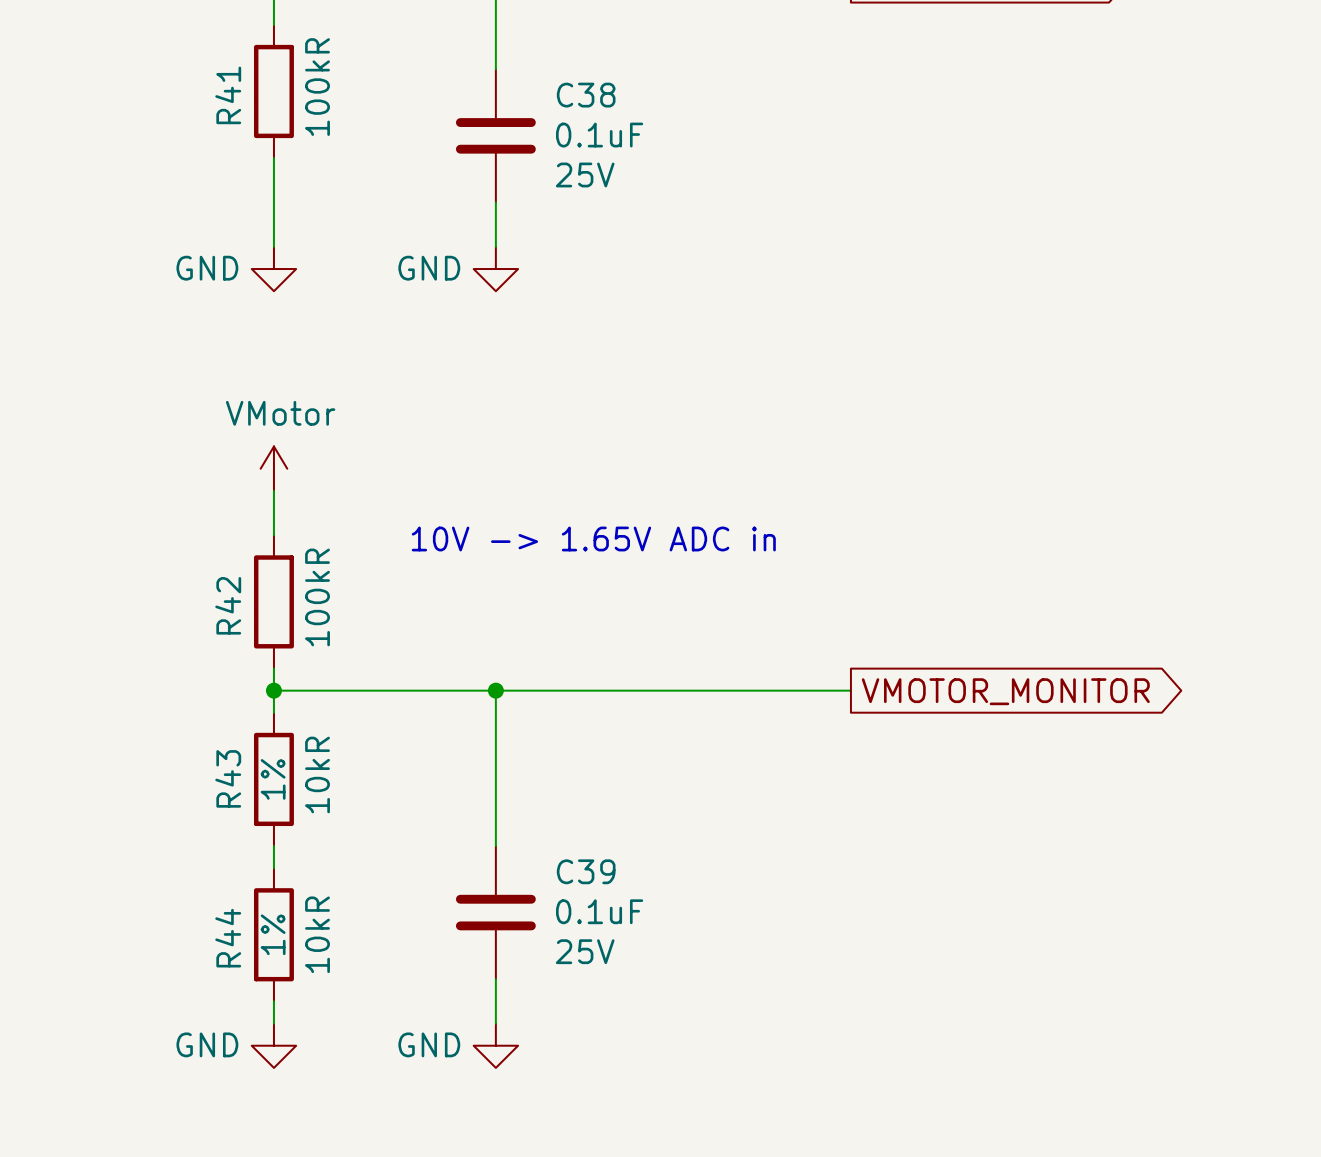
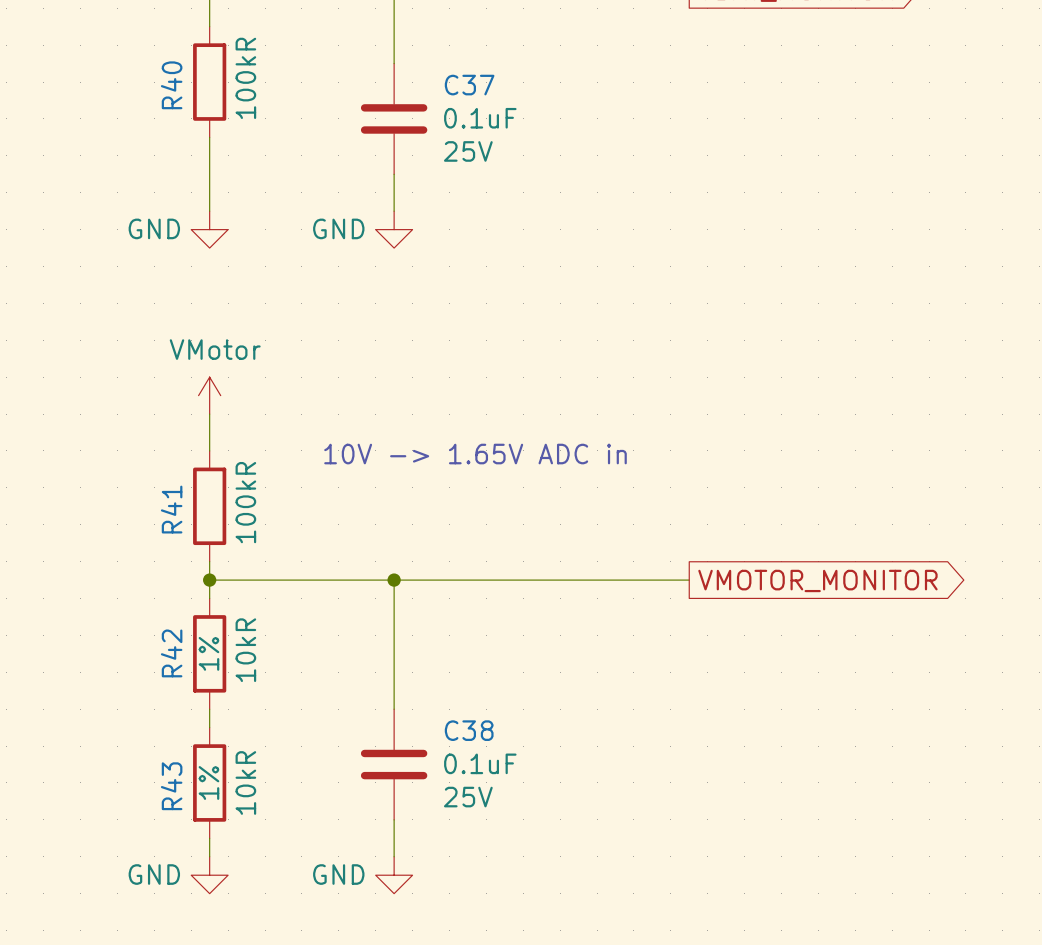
R41 name: R41 (228, 95) -> R40 (171, 85)
C38 name: C38 (586, 95) -> C37 (469, 85)
R42 name: R42 (228, 605) -> R41 (171, 509)
R43 name: R43 (228, 778) -> R42 (171, 653)
C39 name: C39 (586, 871) -> C38 (469, 730)
R44 name: R44 (228, 938) -> R43 (171, 786)

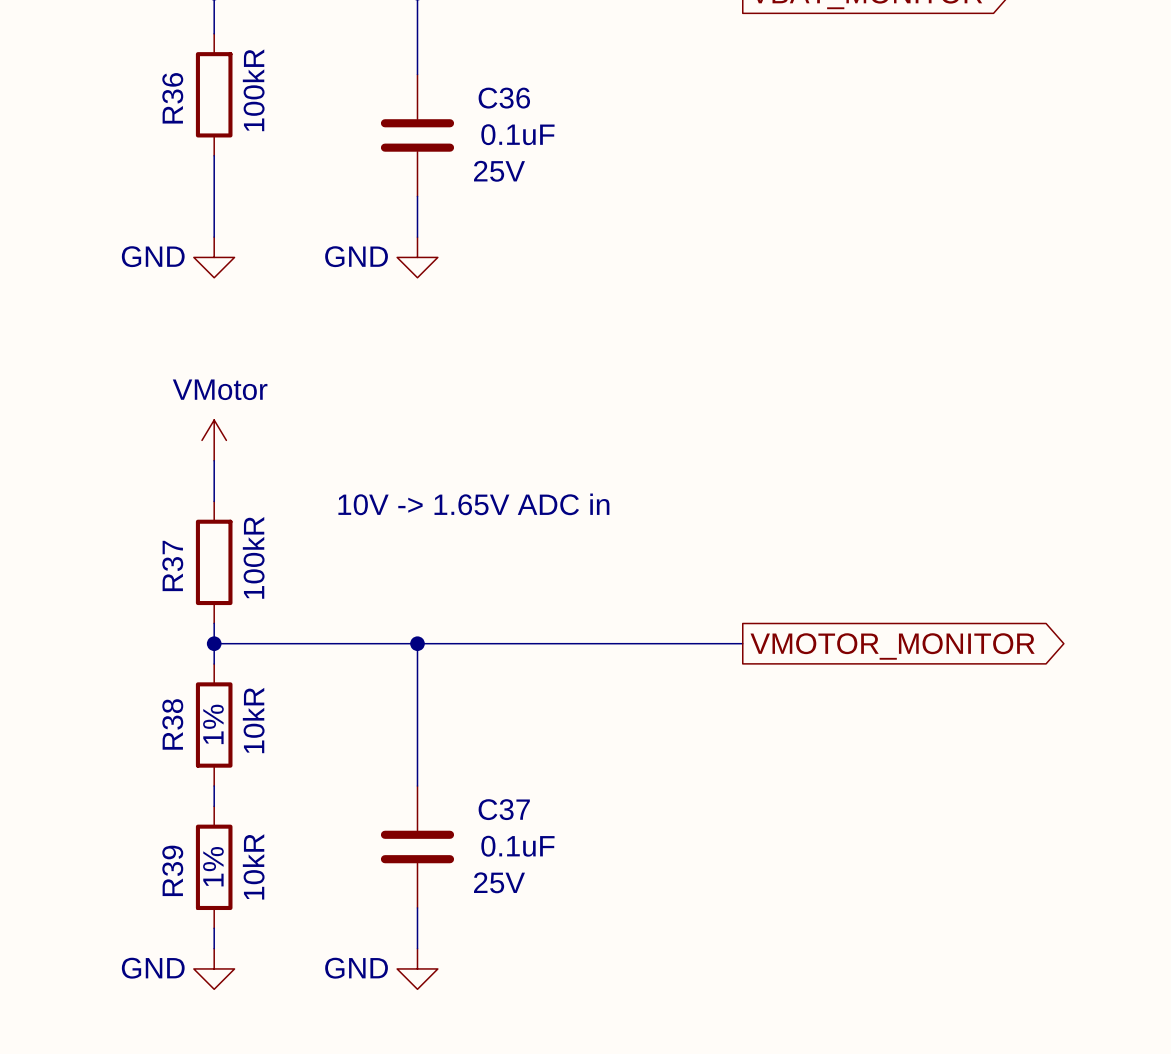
R40 name: R40 (171, 85) -> R36 (172, 98)
C37 name: C37 (469, 85) -> C36 (504, 98)
R41 name: R41 (171, 509) -> R37 (172, 565)
R42 name: R42 (171, 653) -> R38 (172, 724)
C38 name: C38 (469, 730) -> C37 (504, 809)
R43 name: R43 (171, 786) -> R39 (172, 870)

